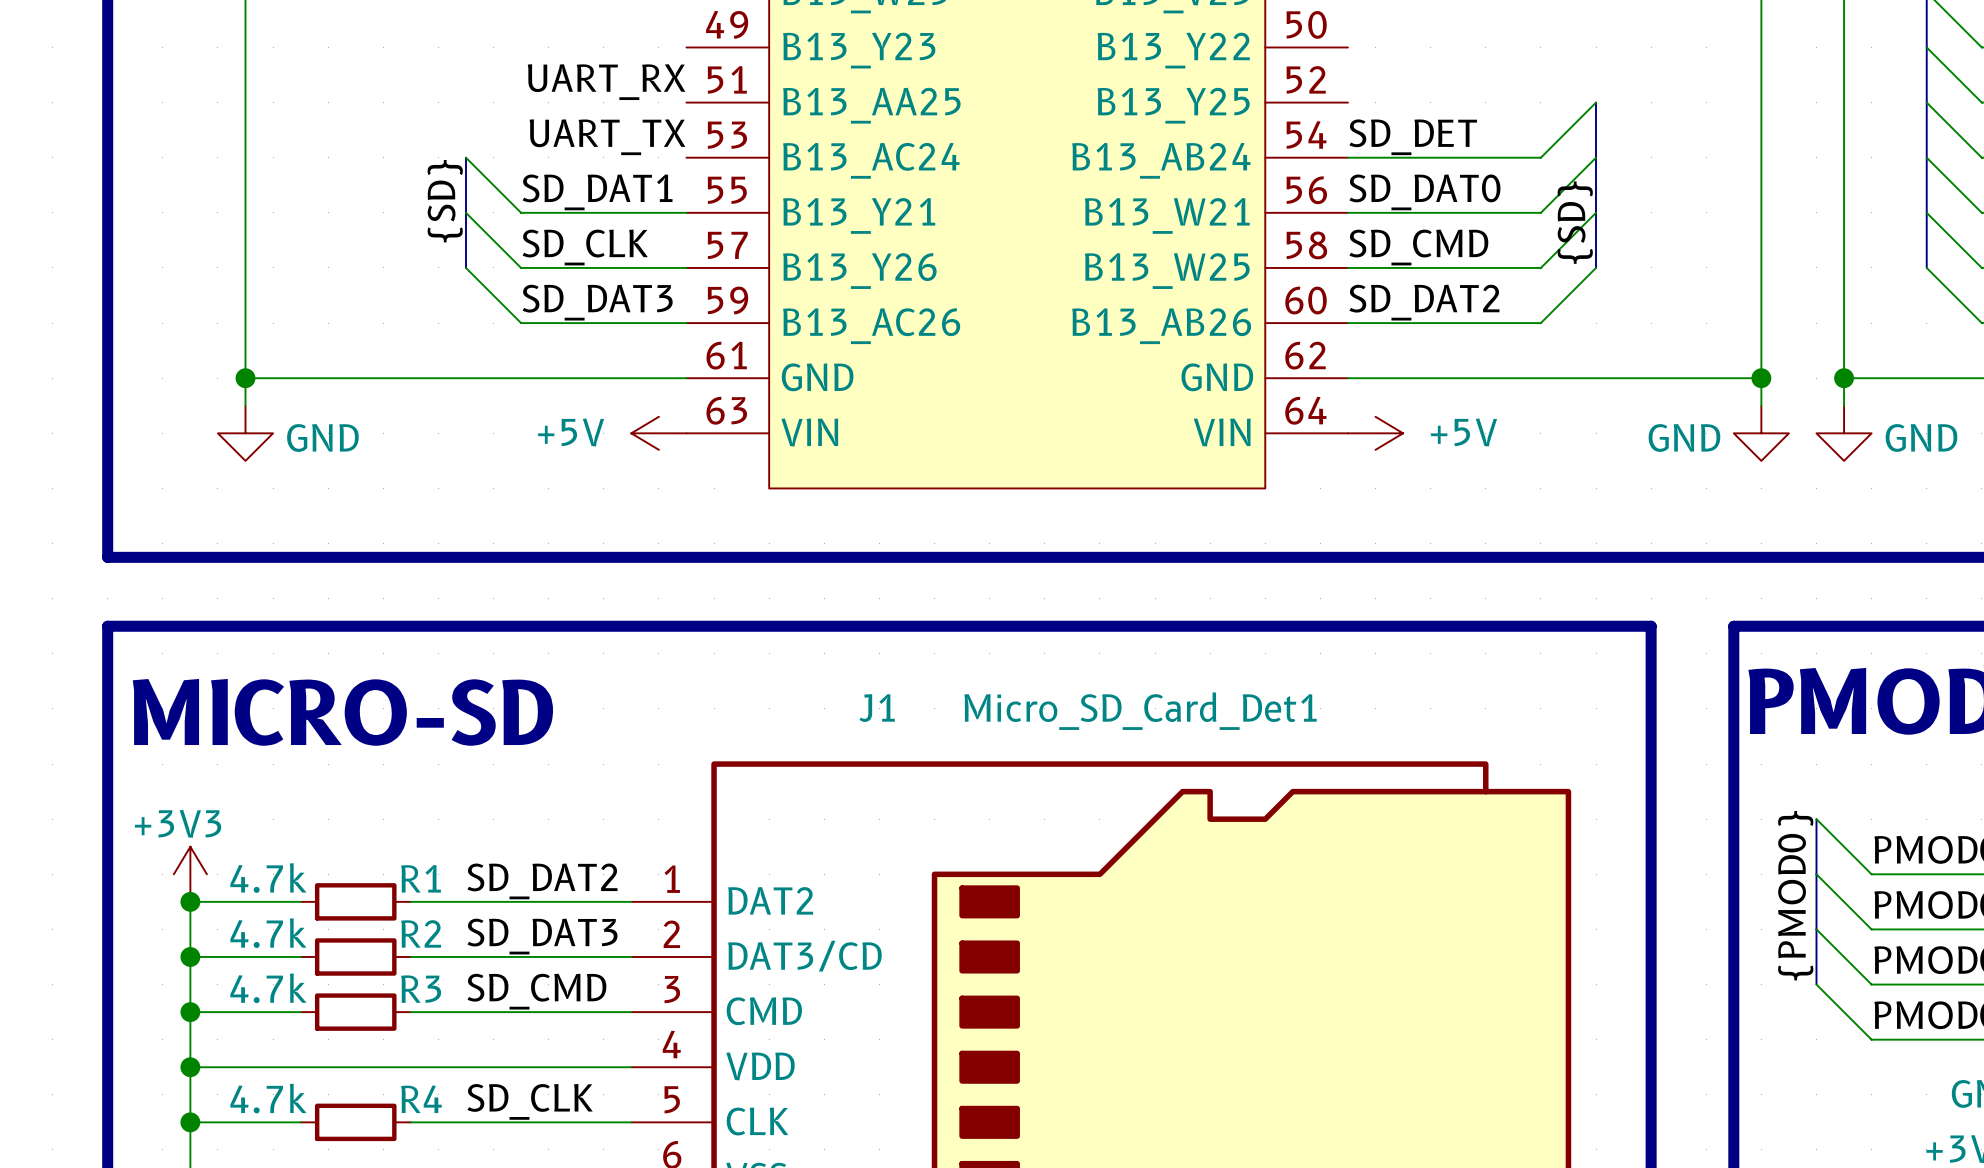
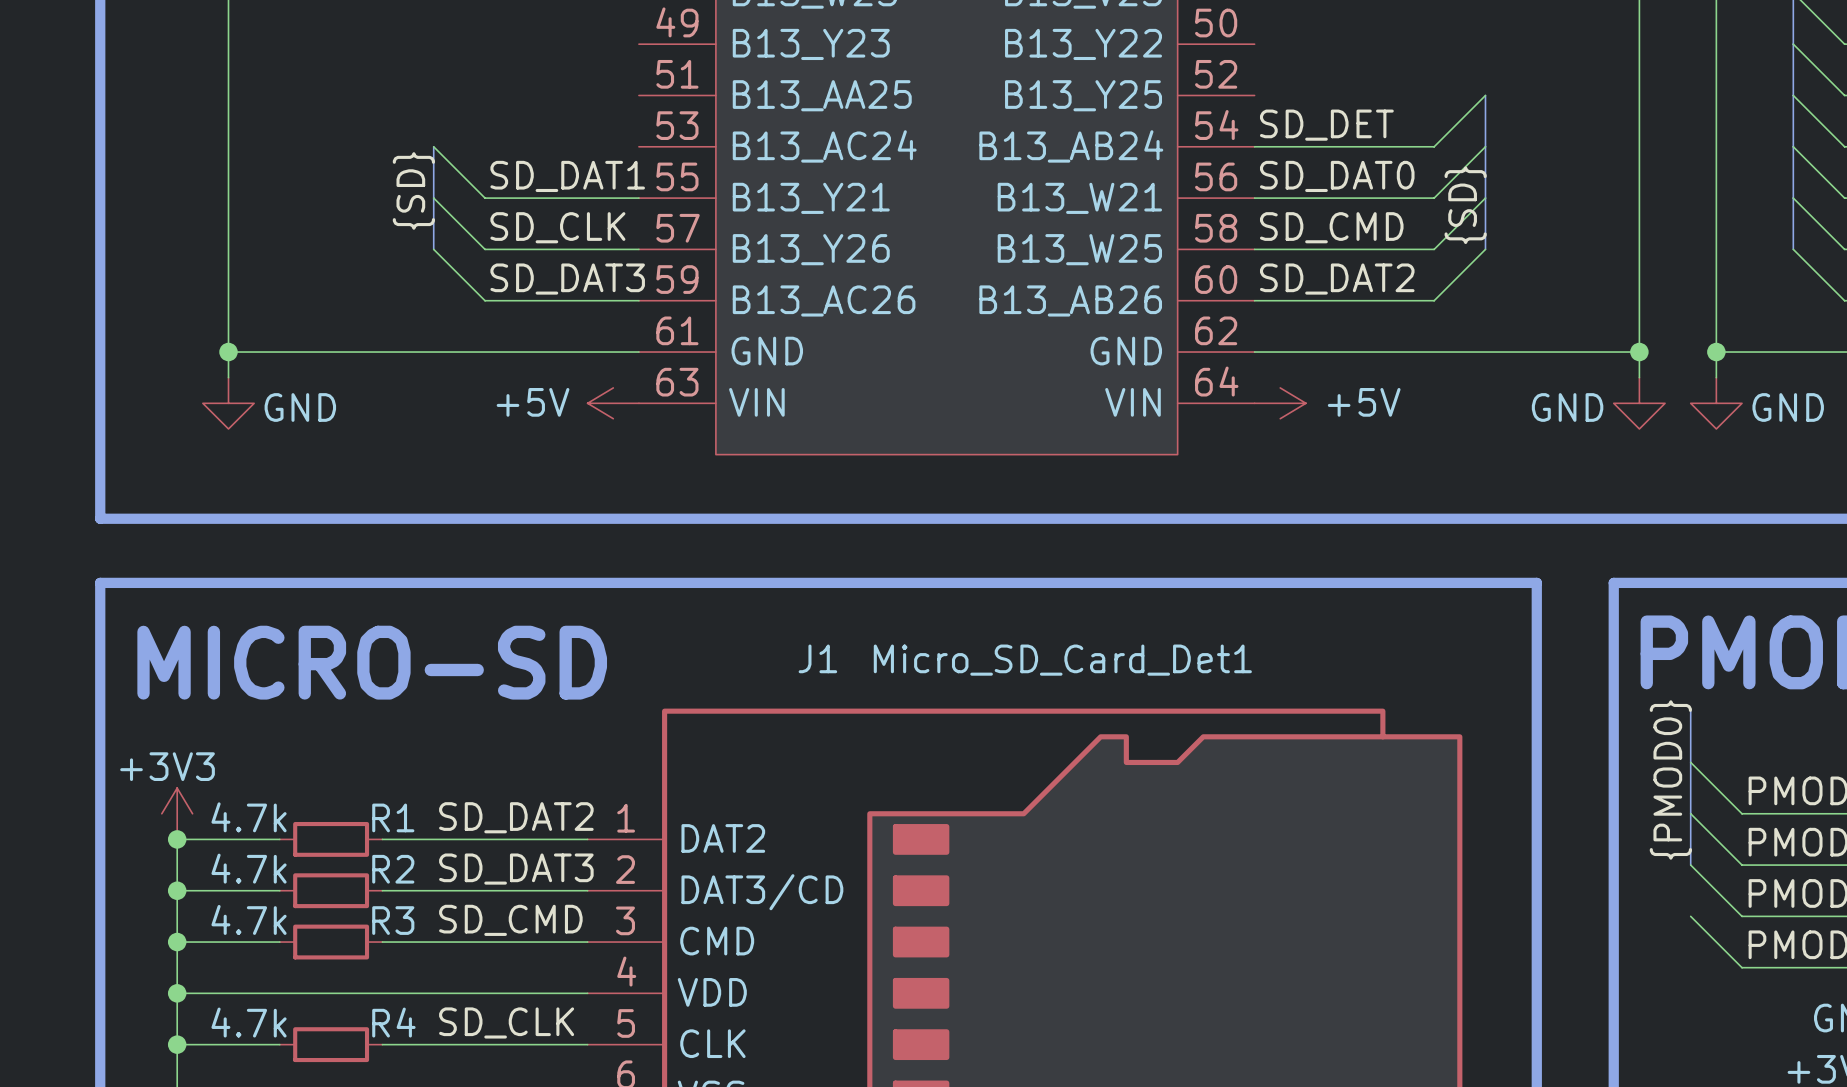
label: UART_RX (606, 82) -> none
label: UART_TX (607, 137) -> none
label position: {PMOD0} (1795, 895) -> {PMOD0} (1670, 779)
bus: (1816, 929) (1816, 984) -> (1690, 711) (1690, 762)

